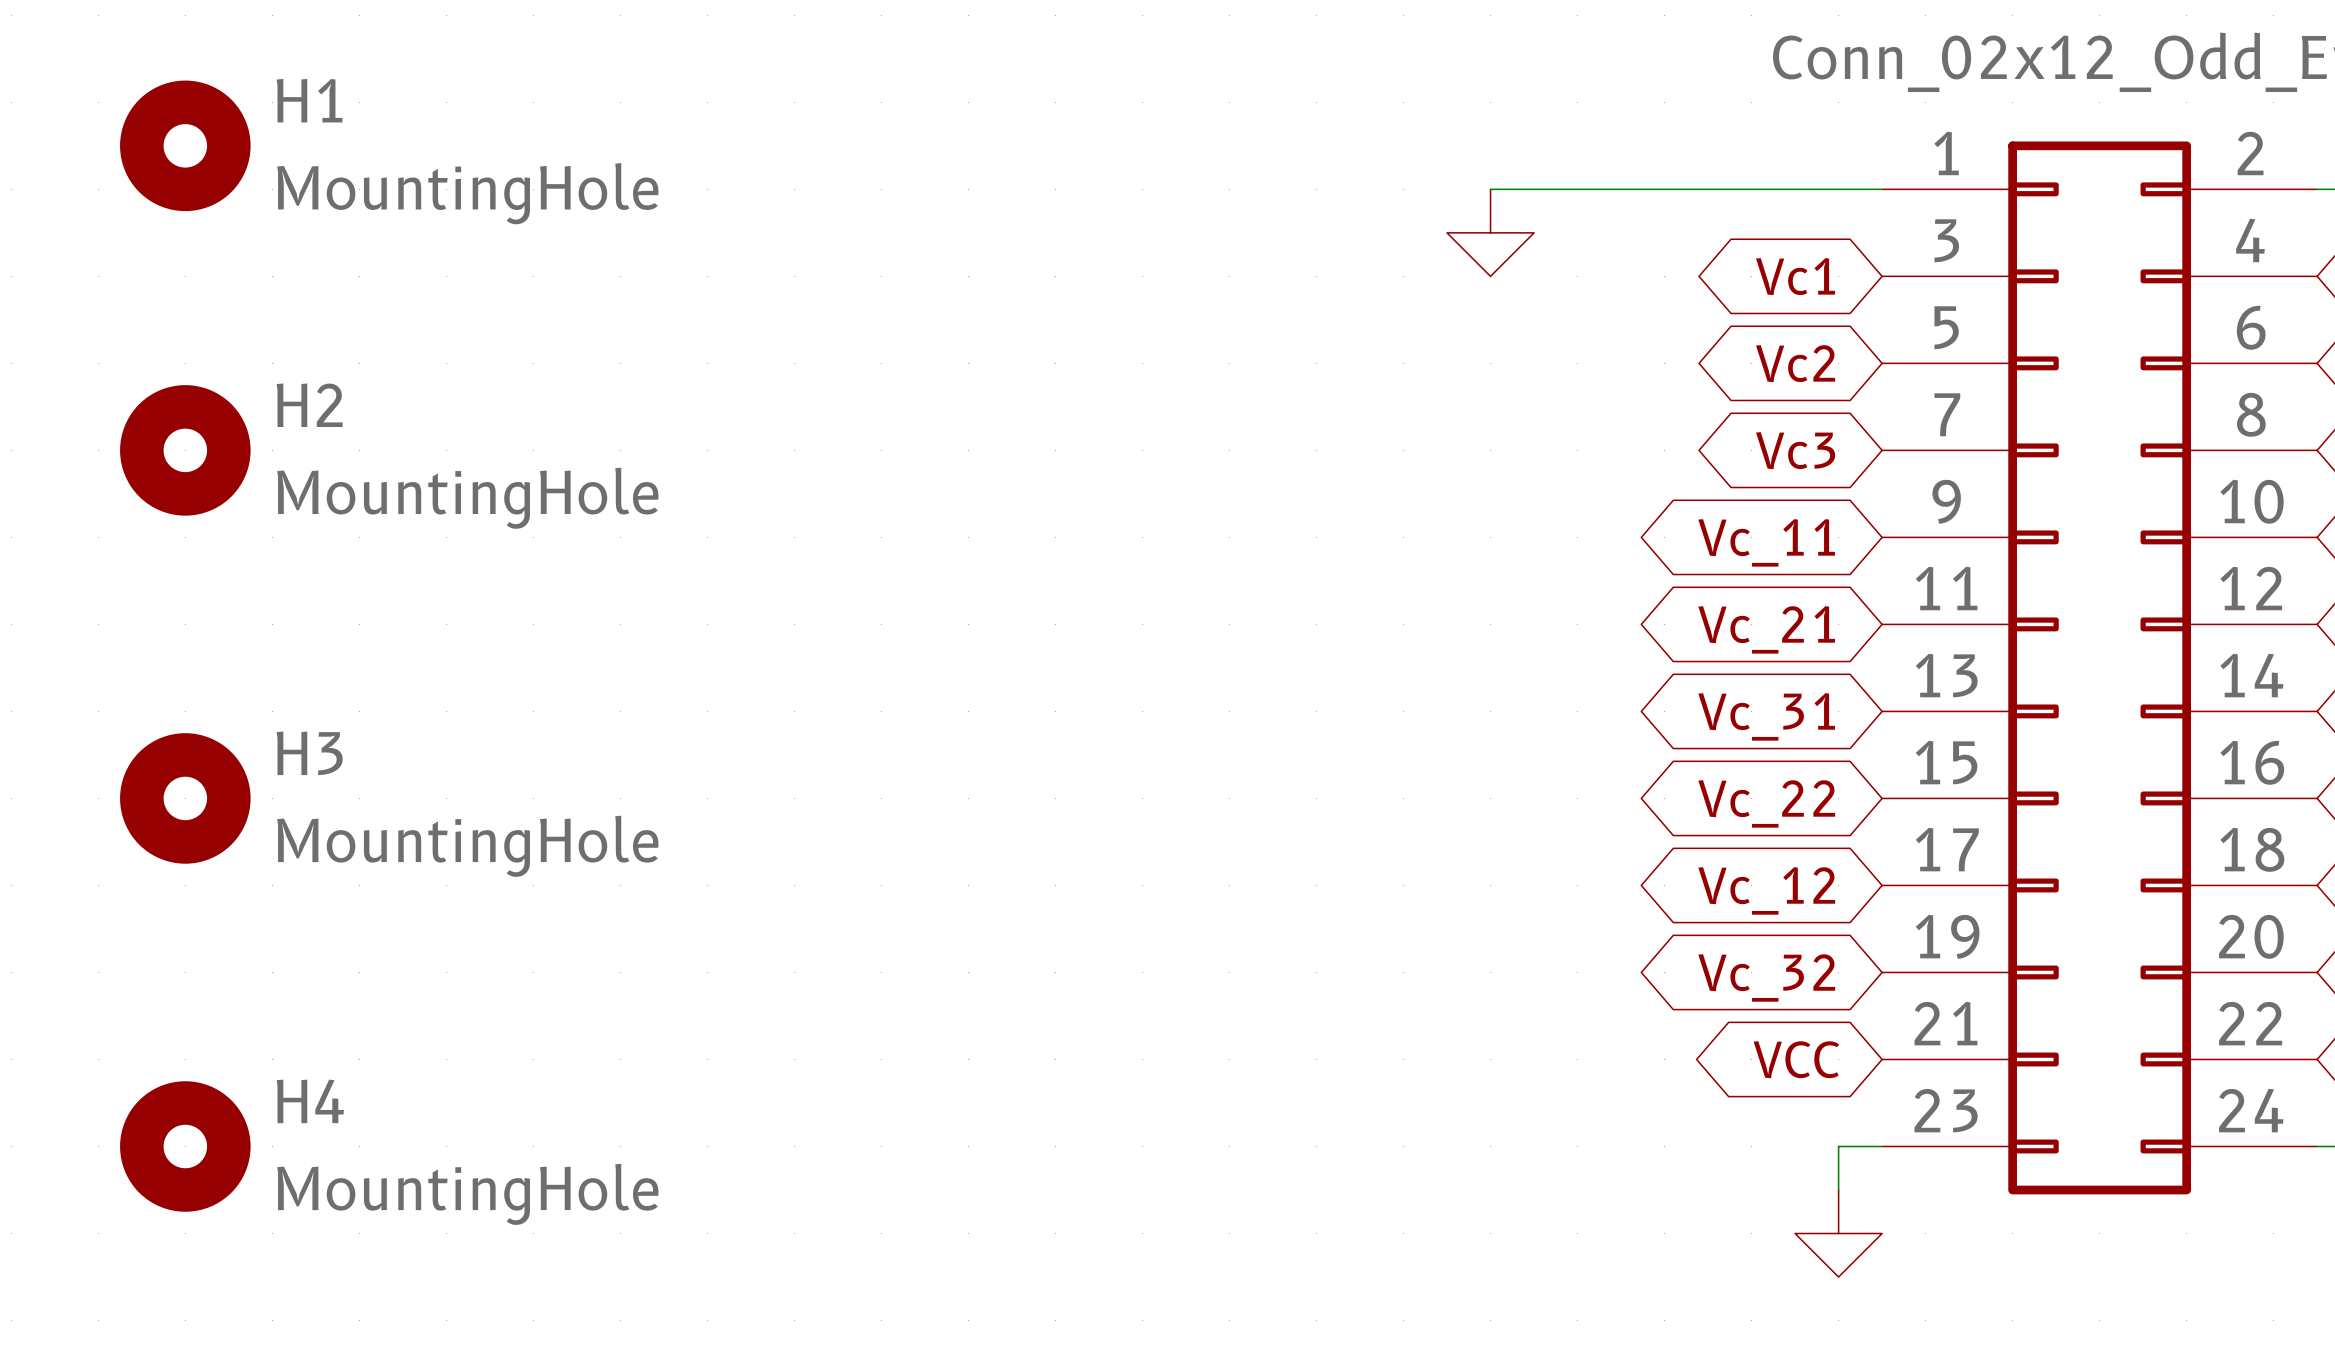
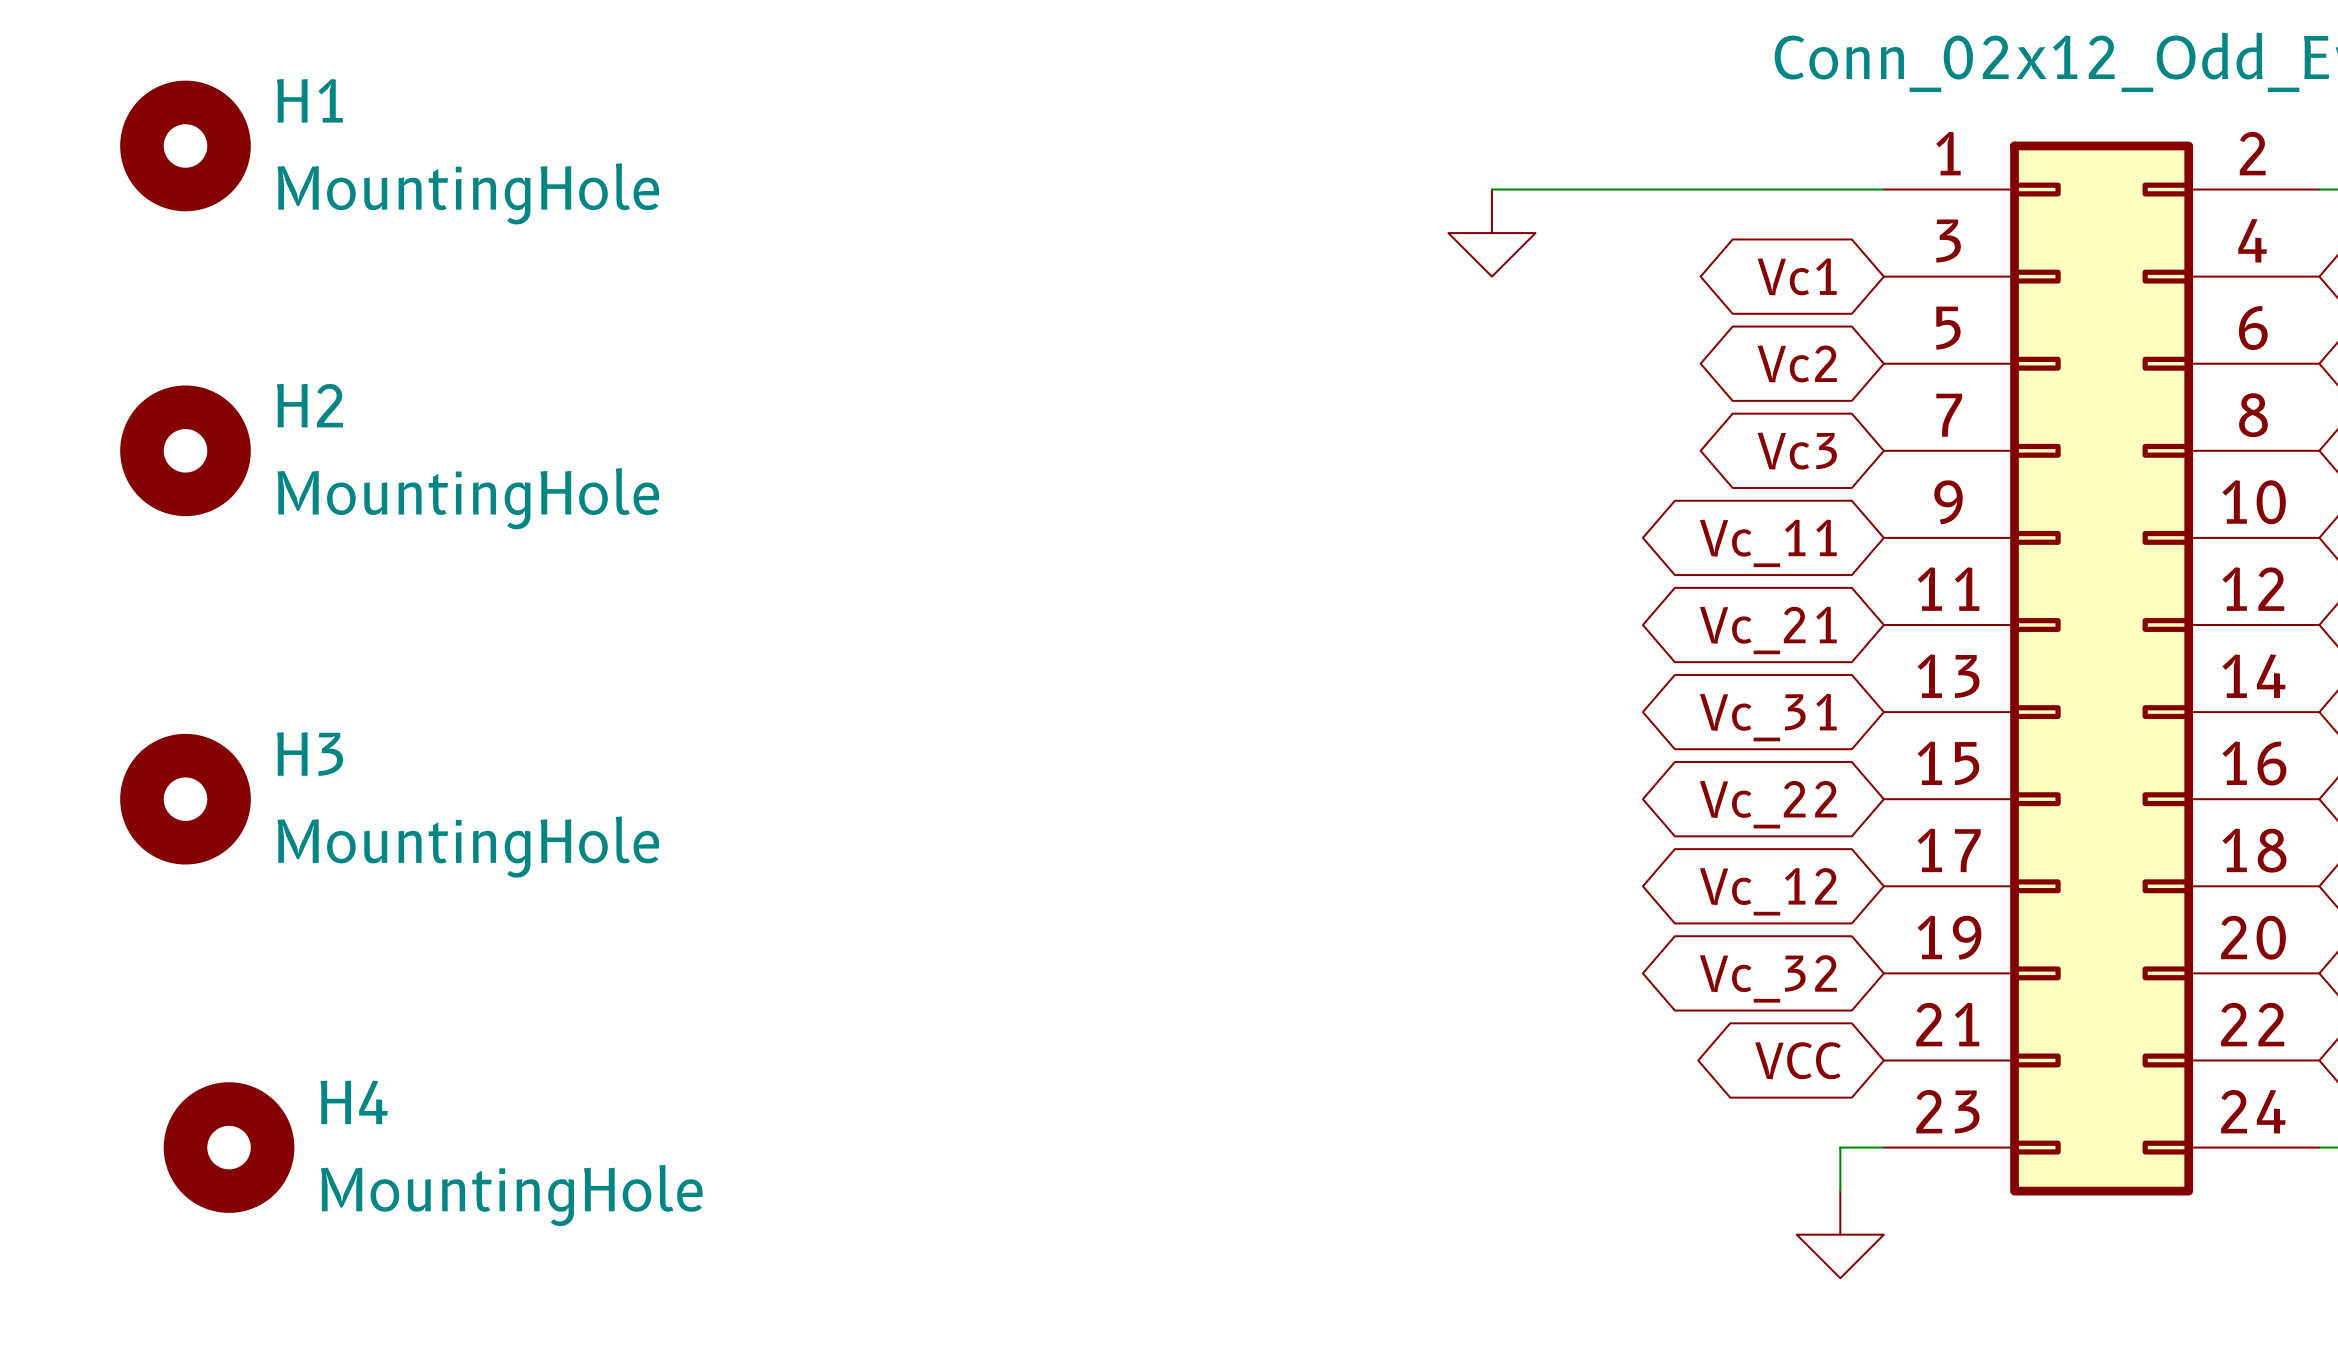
H4 position: (185, 1146) -> (229, 1147)

